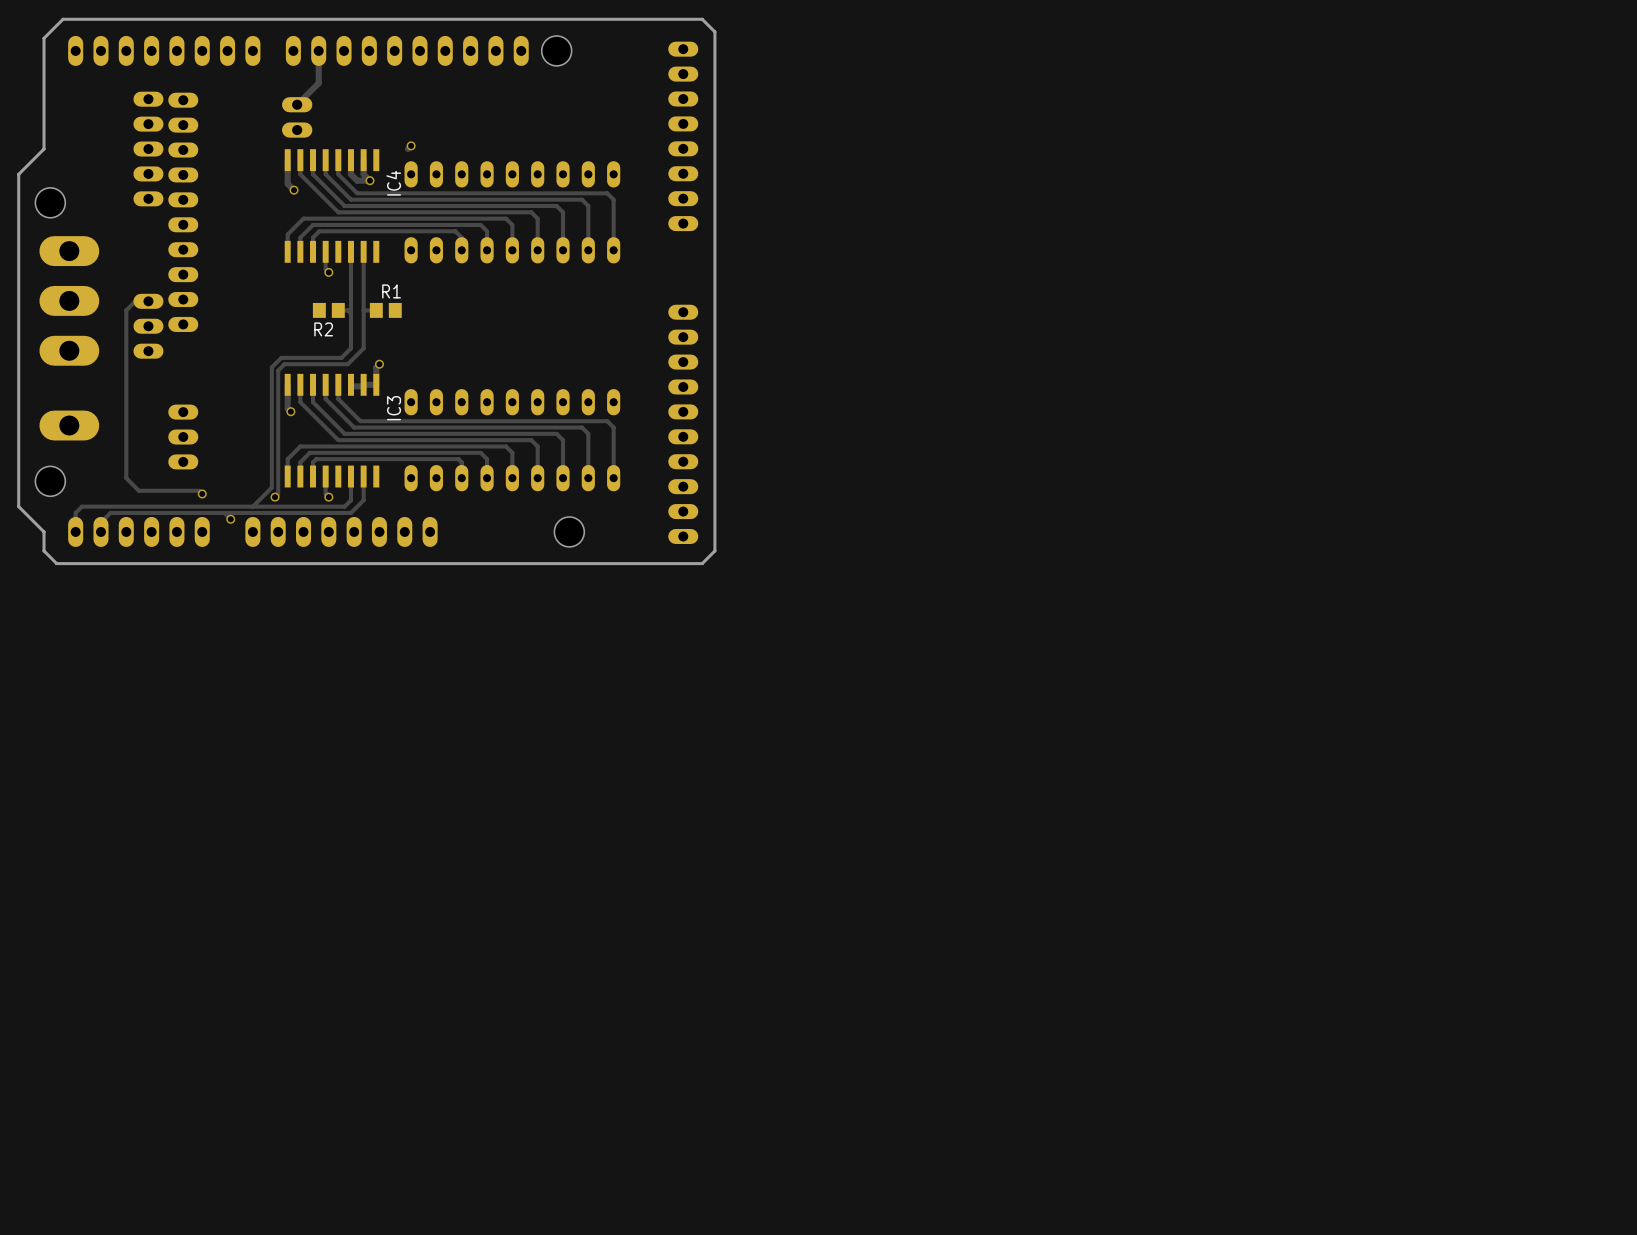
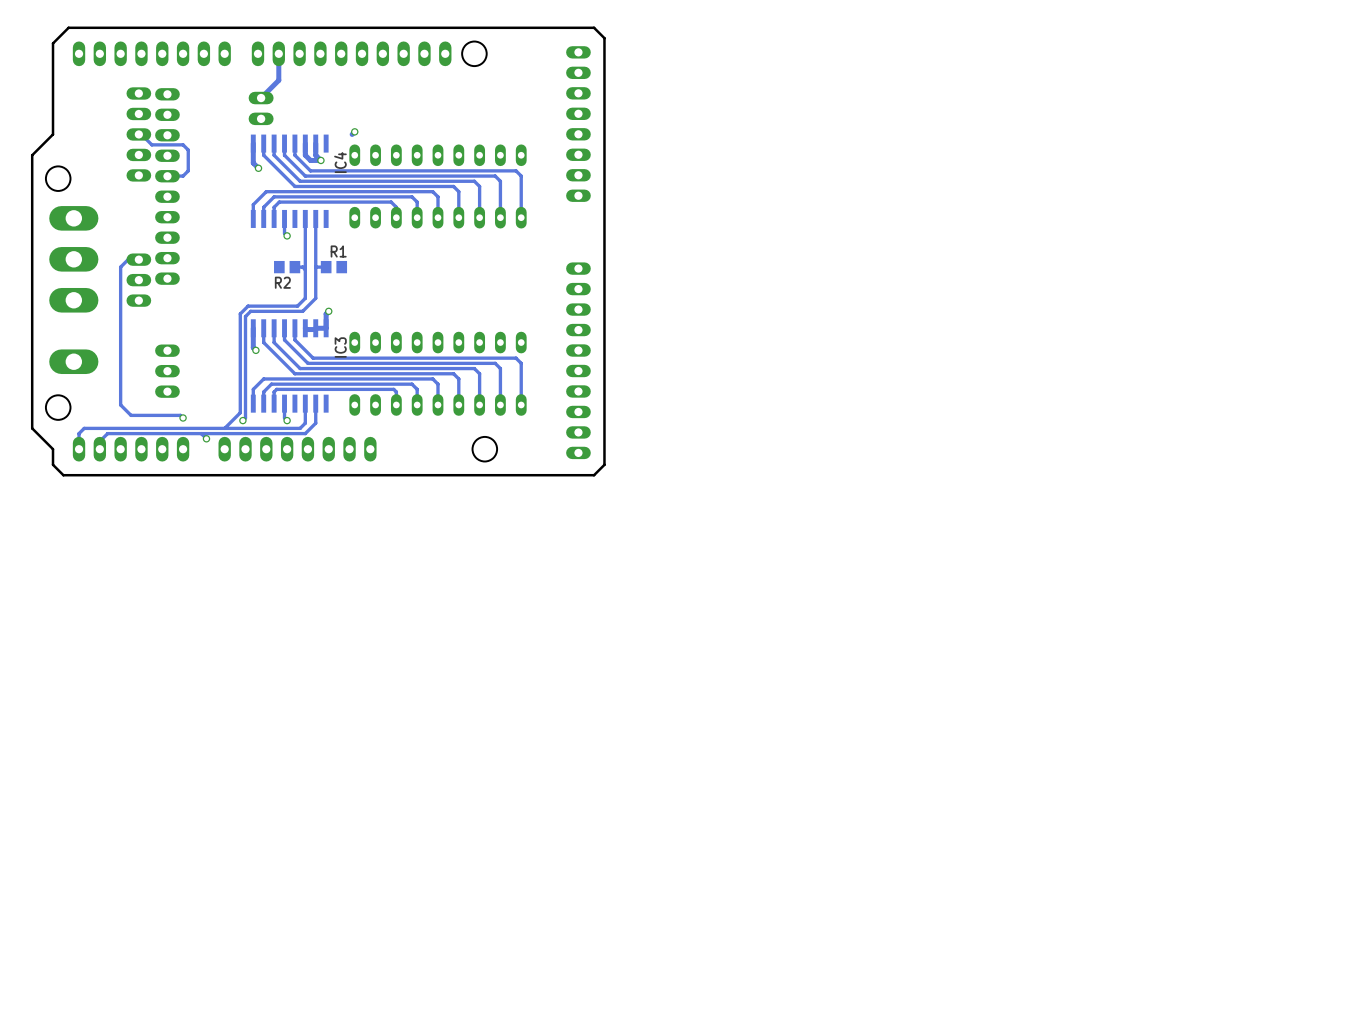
track: none -> (138, 134) (141, 134) (151, 144) (183, 144) (188, 150) (188, 170) (183, 176) (167, 176)

